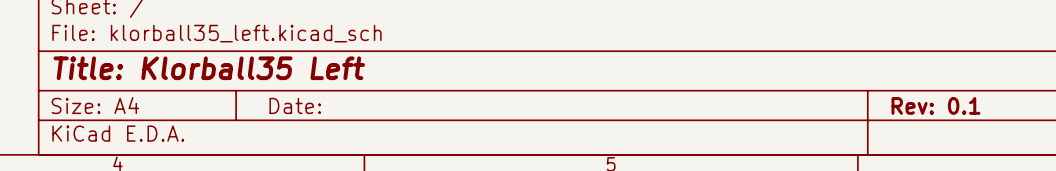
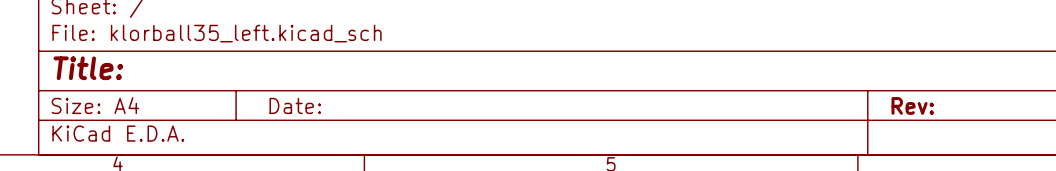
title block: Title: Klorball35 Left (209, 68) -> Title: (88, 68)
title block: Rev: 0.1 (935, 105) -> Rev: (912, 105)

